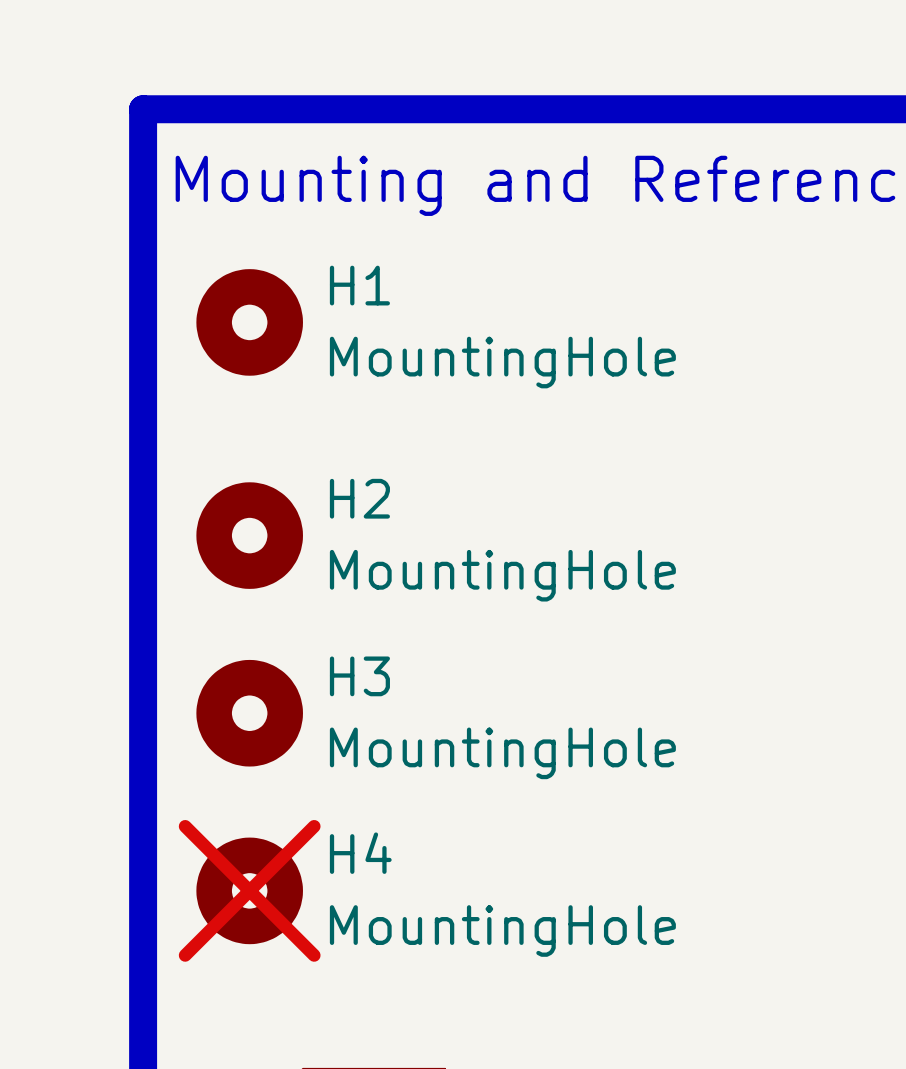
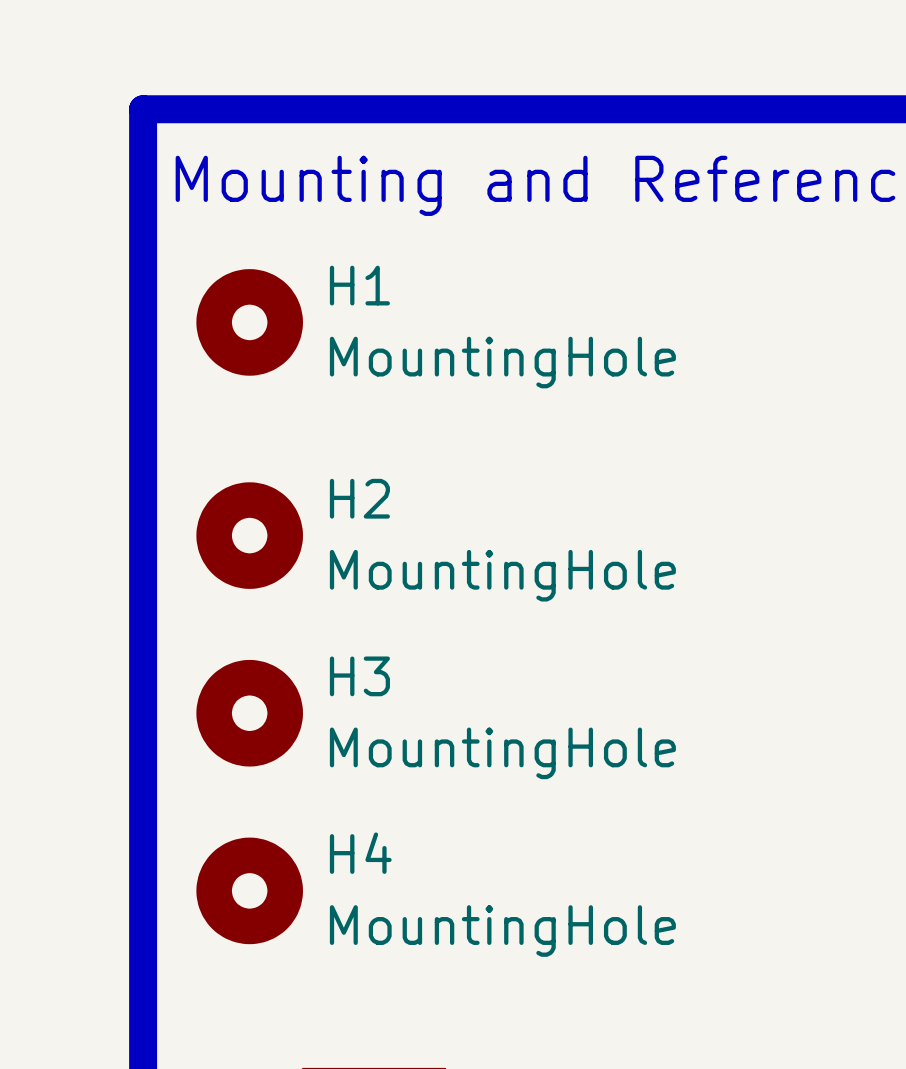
H4 do-not-place cross: (249, 890) -> none

